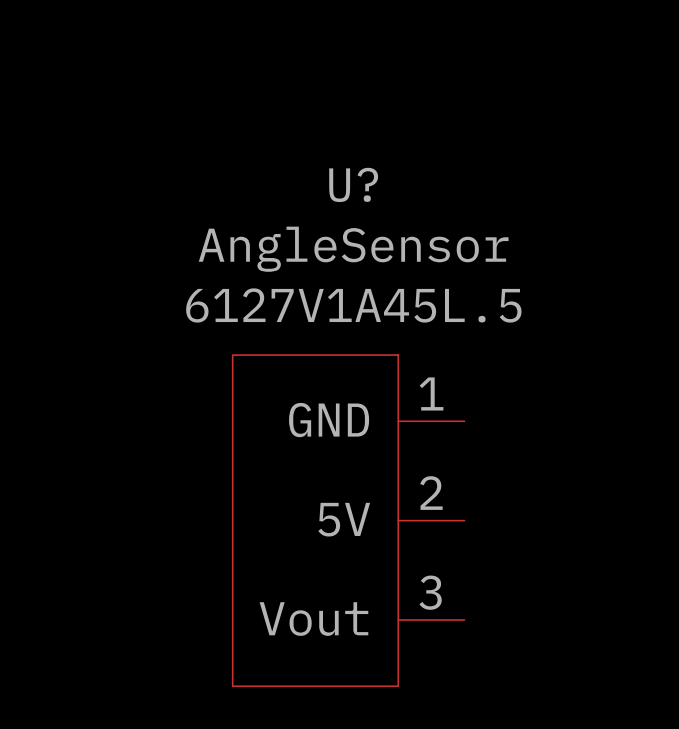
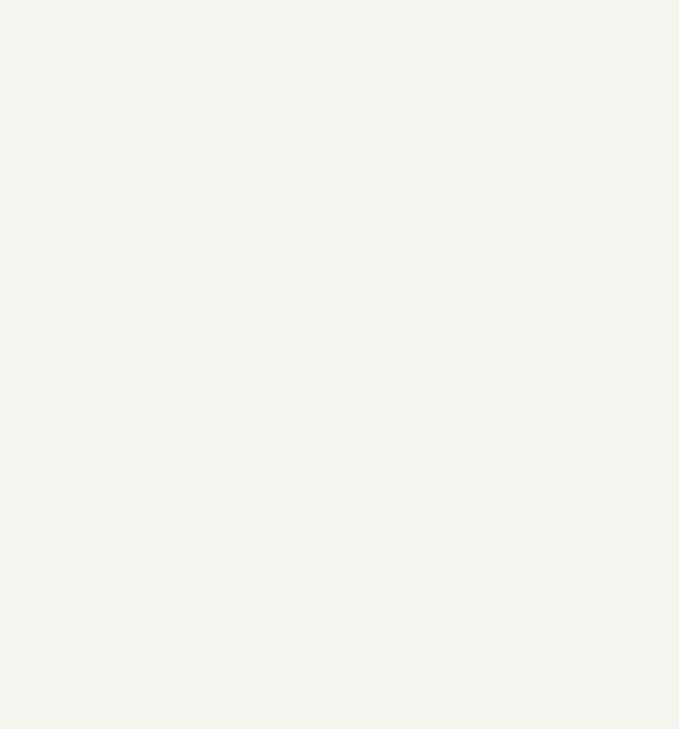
U?: AngleSensor (348, 520) -> none

